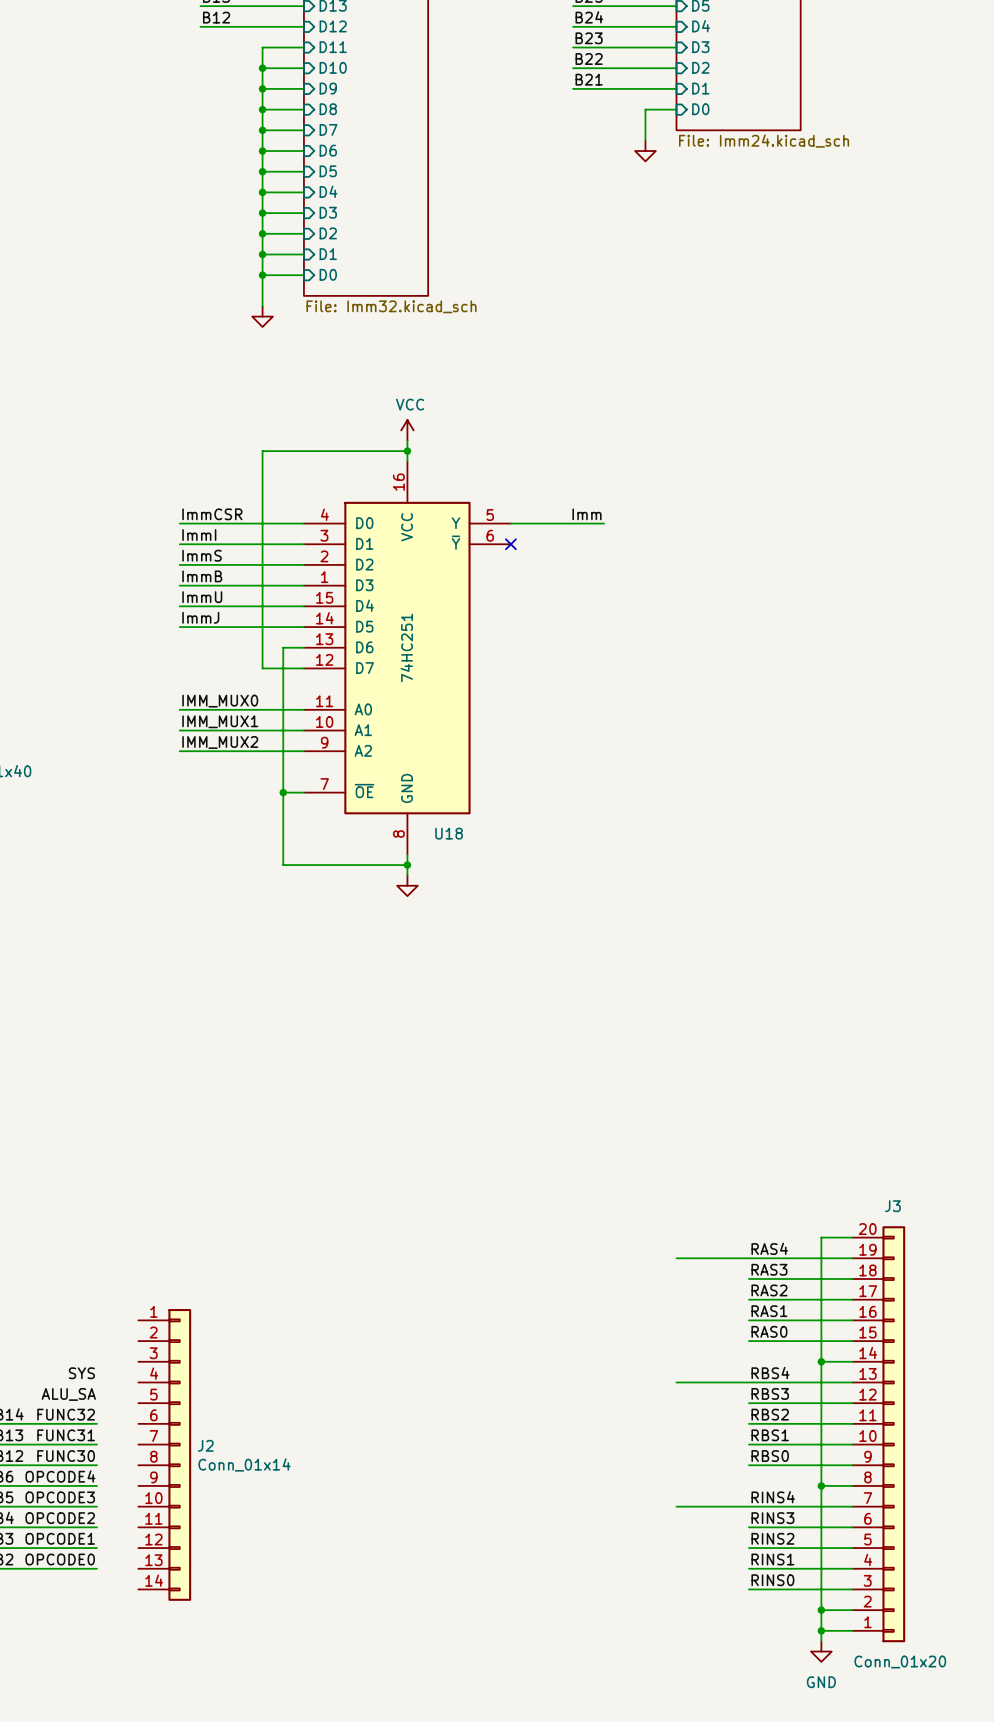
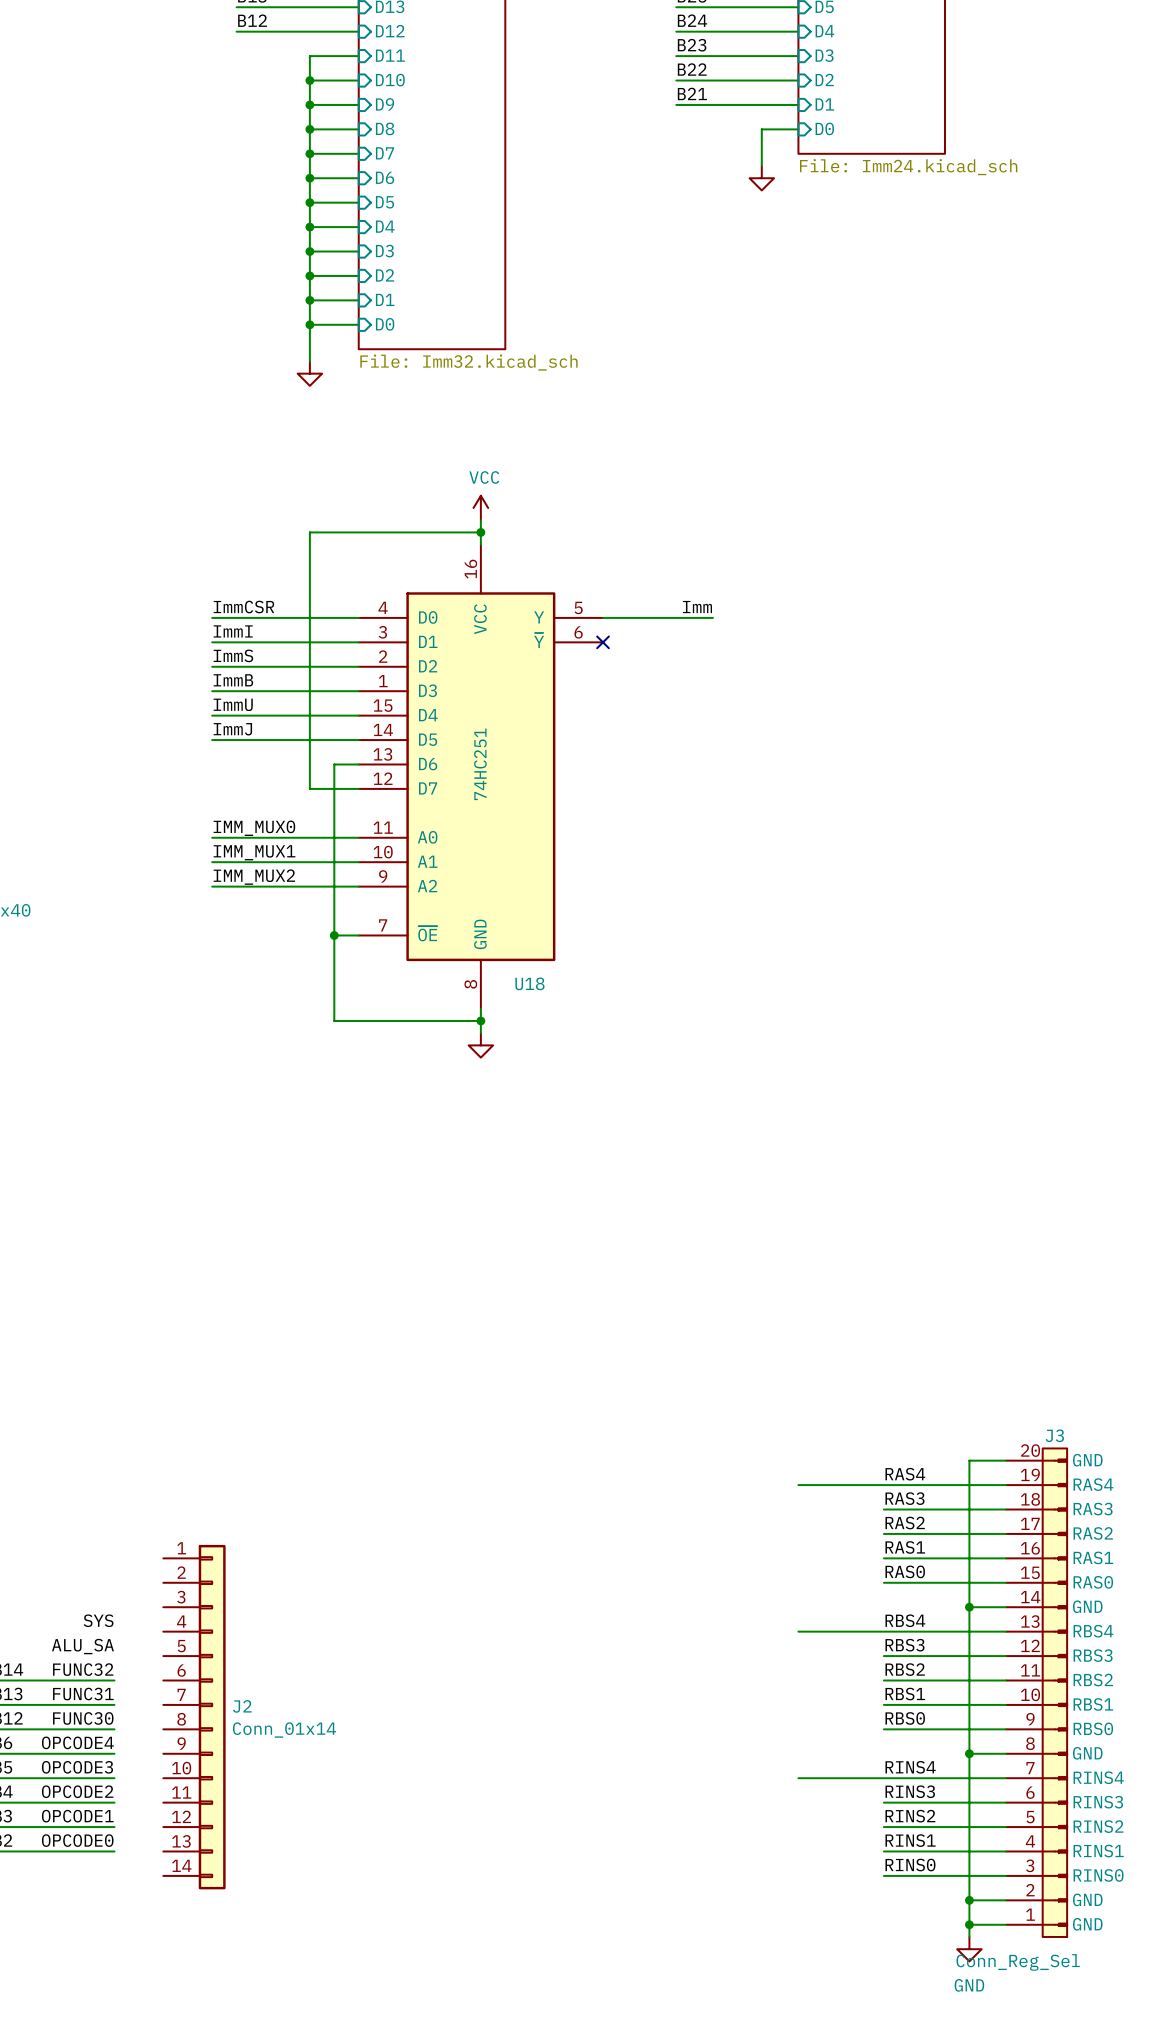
J3 symbol: [852, 1226, 906, 1643] -> [1006, 1448, 1068, 1937]
J3 value: Conn_01x20 (900, 1661) -> Conn_Reg_Sel (1018, 1962)

